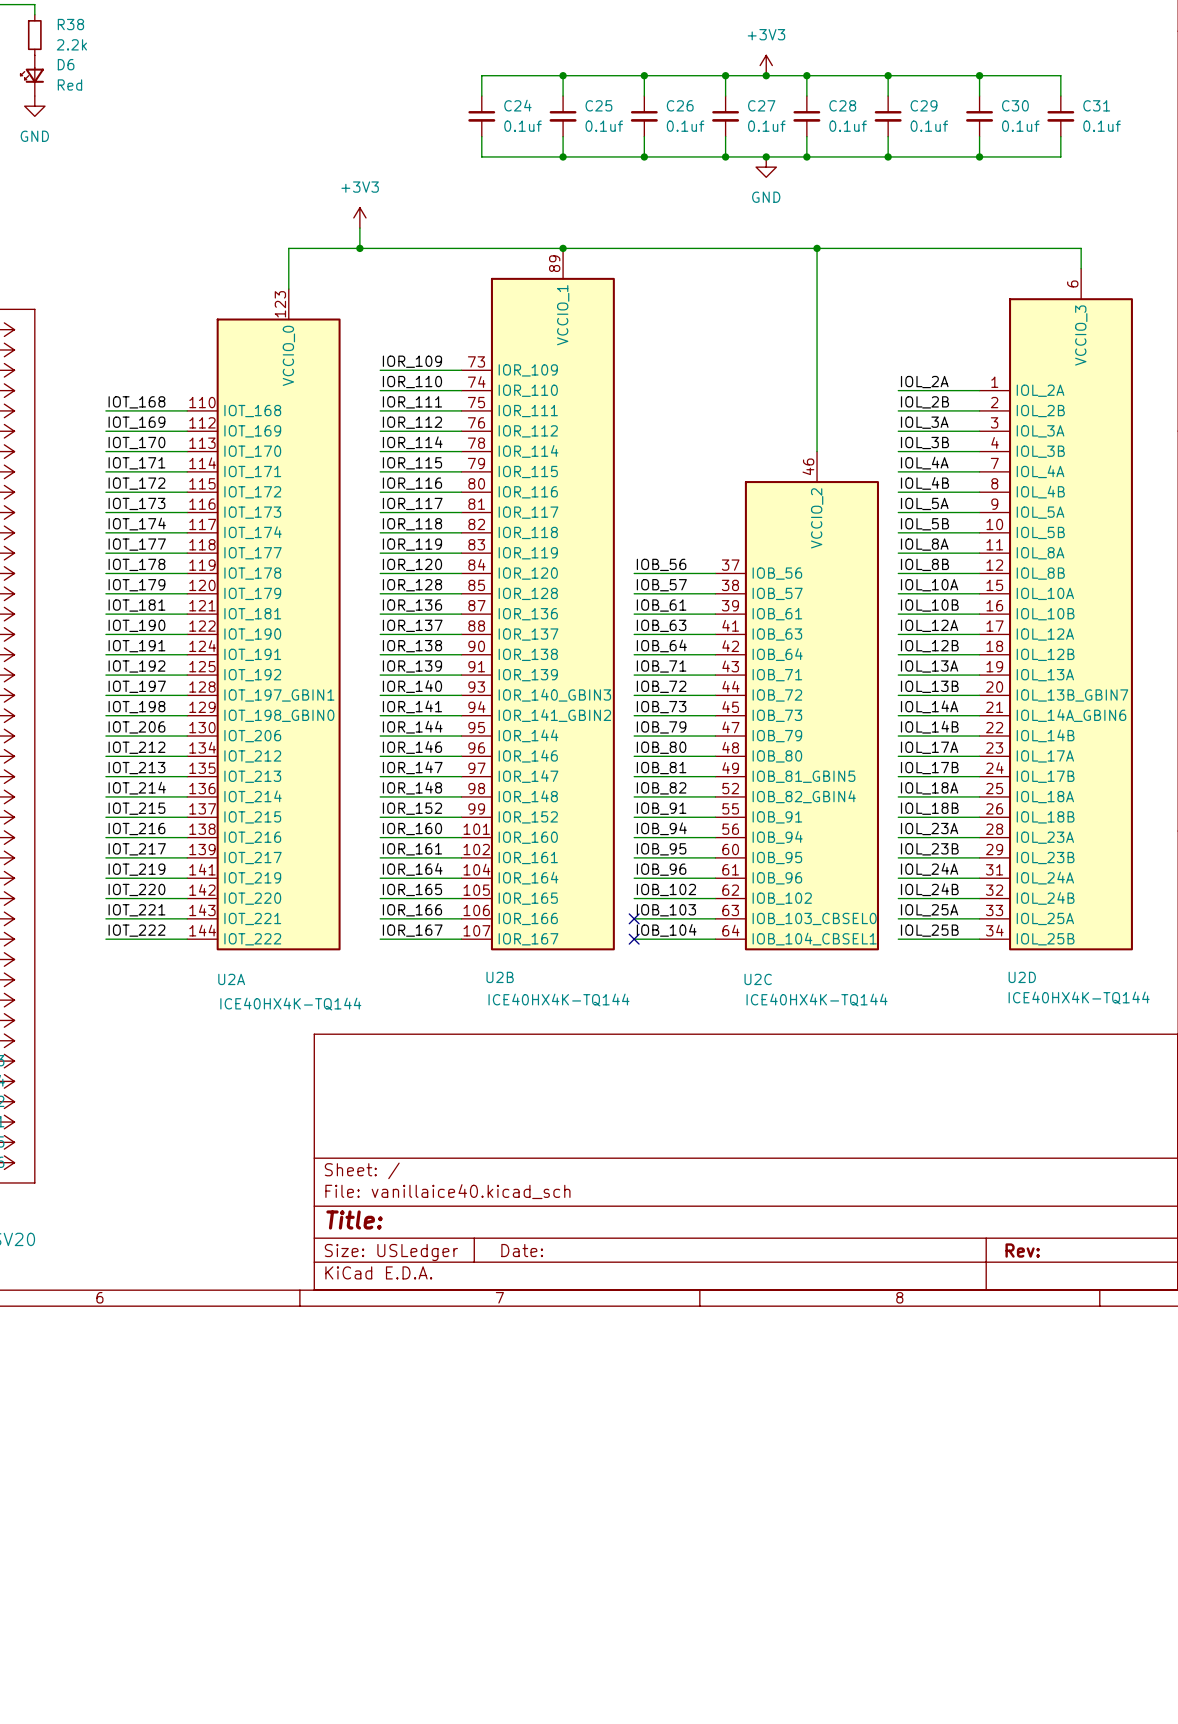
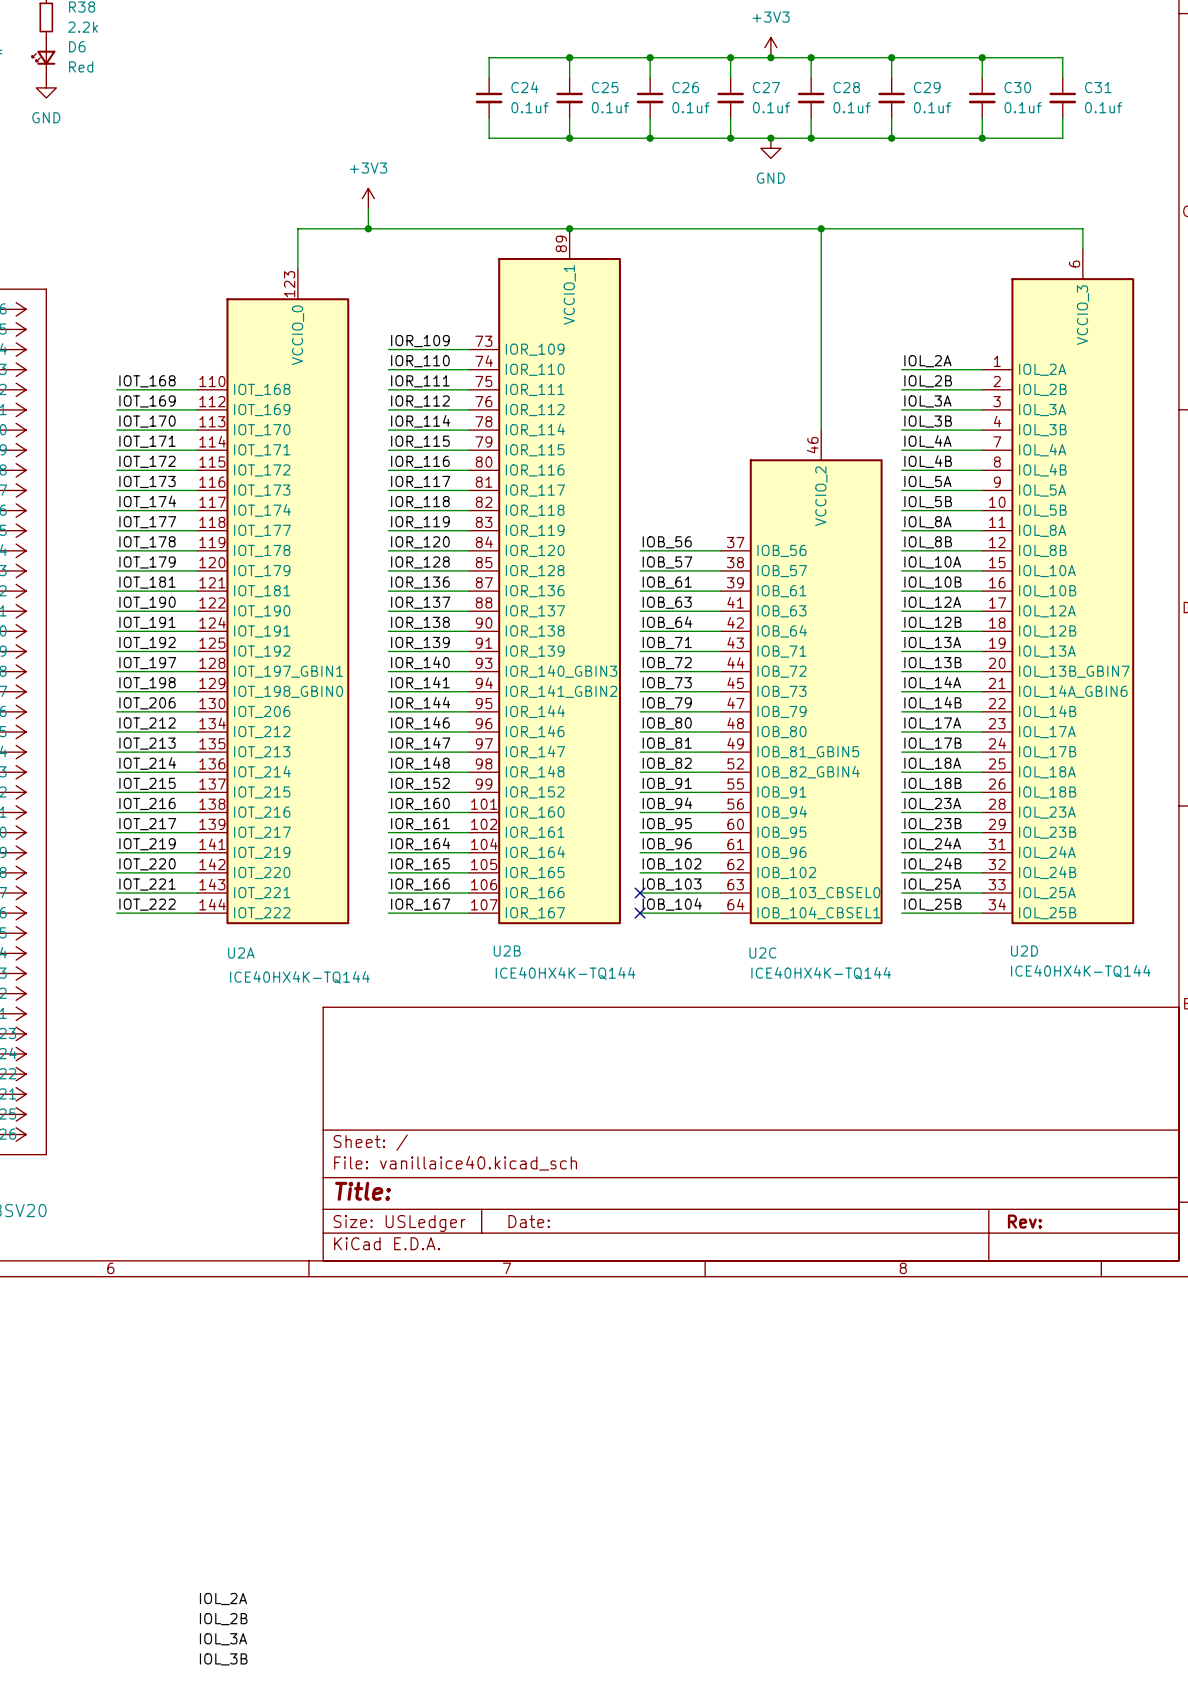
label: none -> IOL_2A (223, 1599)
label: none -> IOL_2B (223, 1619)
label: none -> IOL_3A (223, 1639)
label: none -> IOL_3B (223, 1659)

